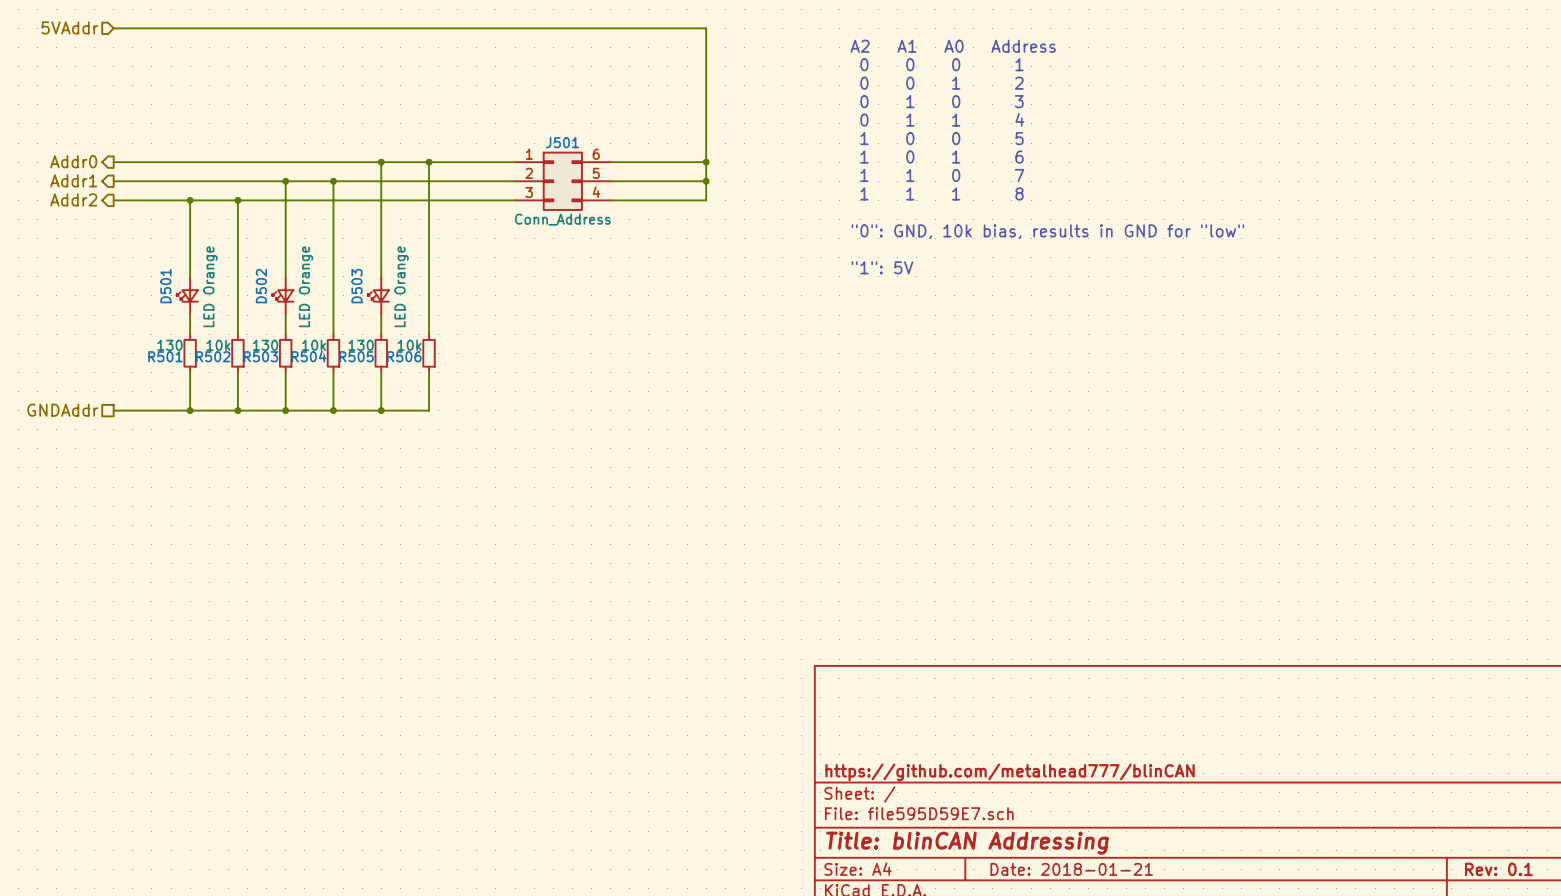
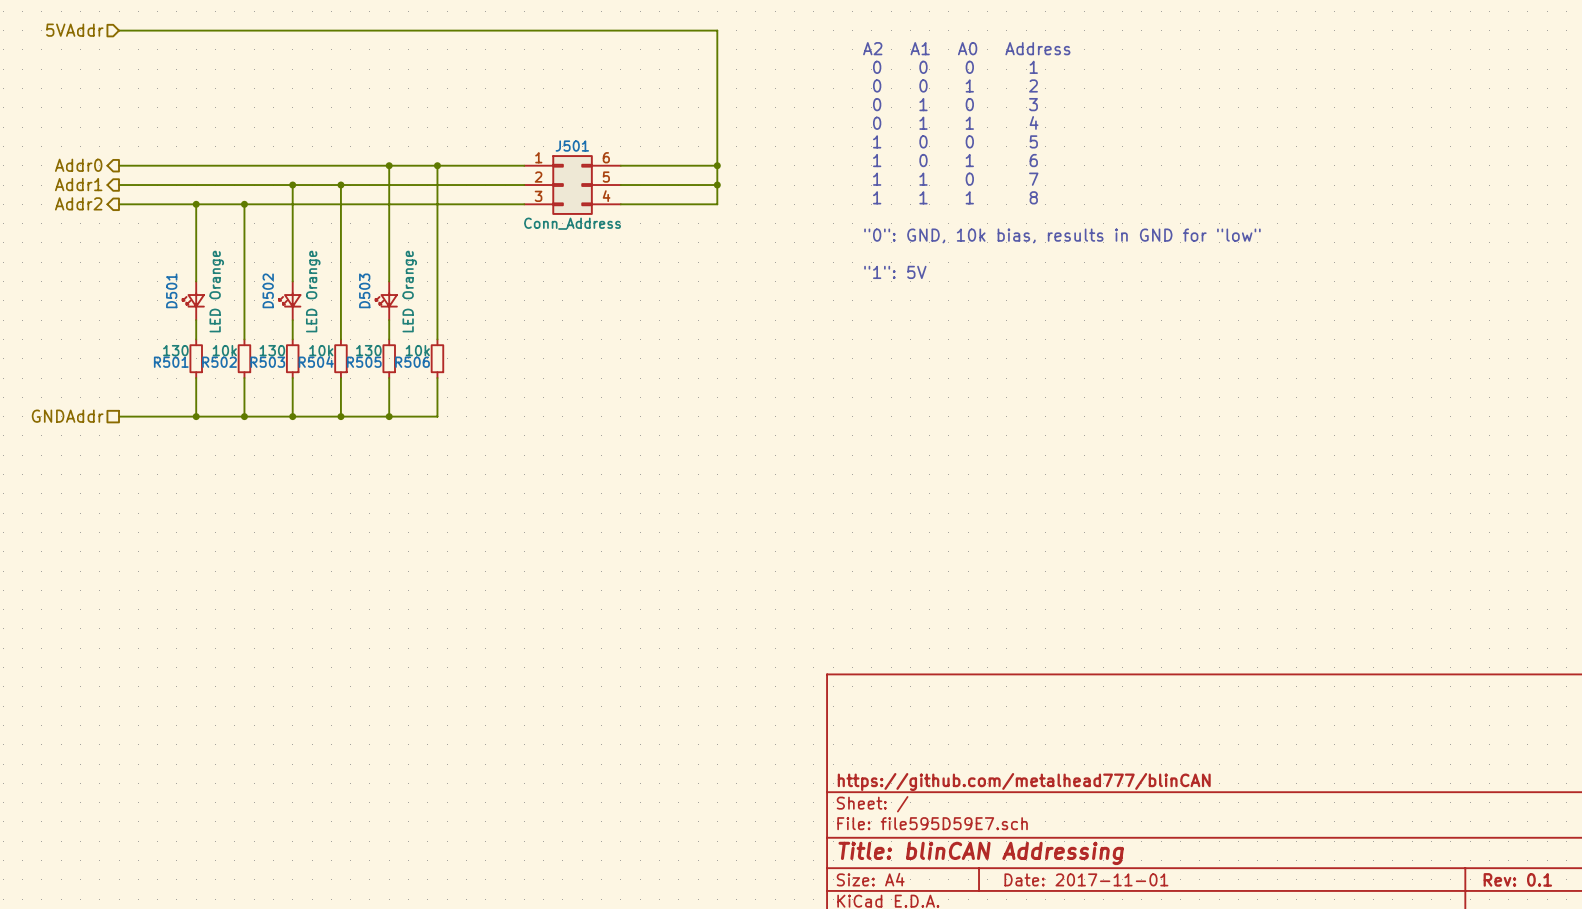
title block: Date: 2018-01-21 (1071, 869) -> Date: 2017-11-01 (1086, 879)

